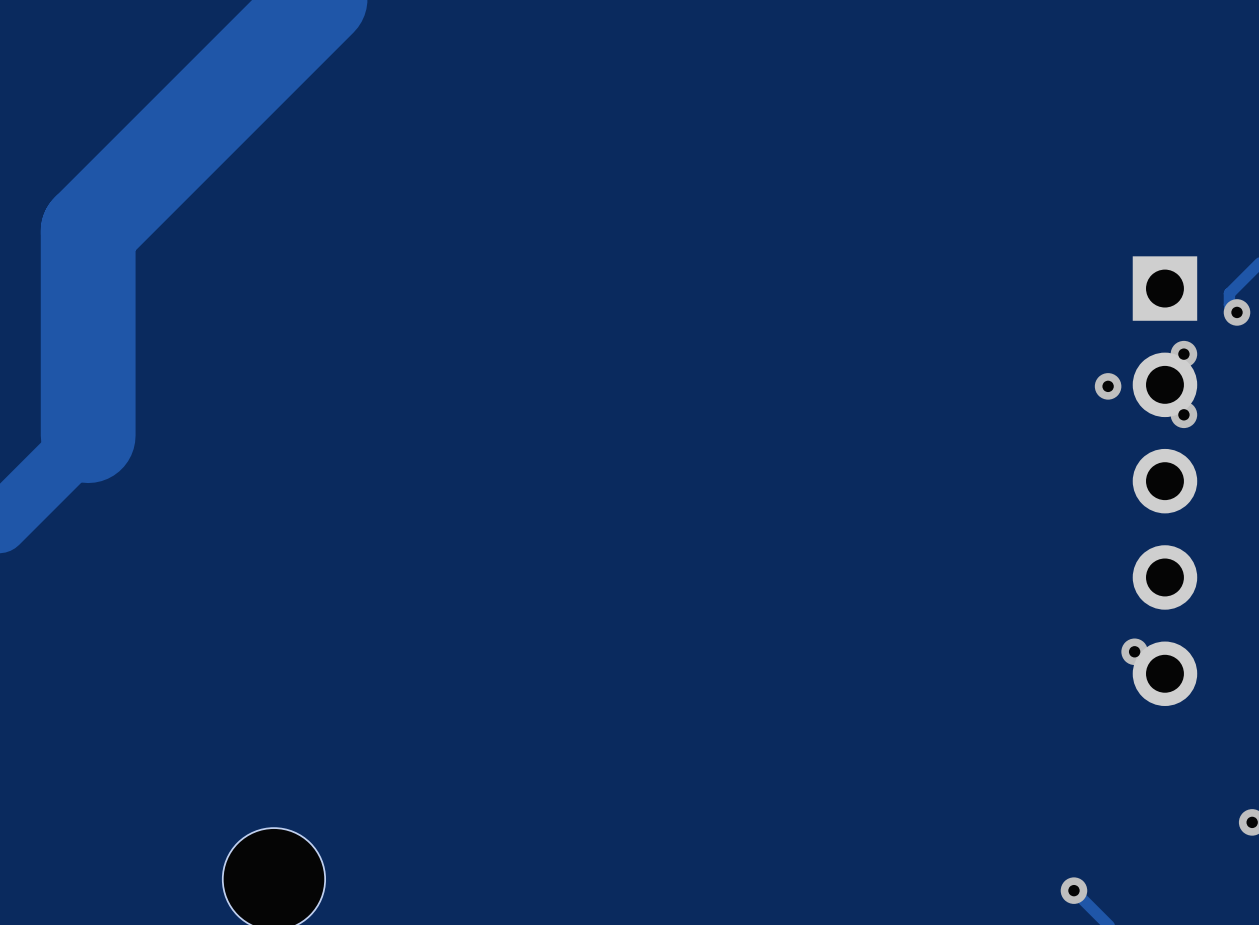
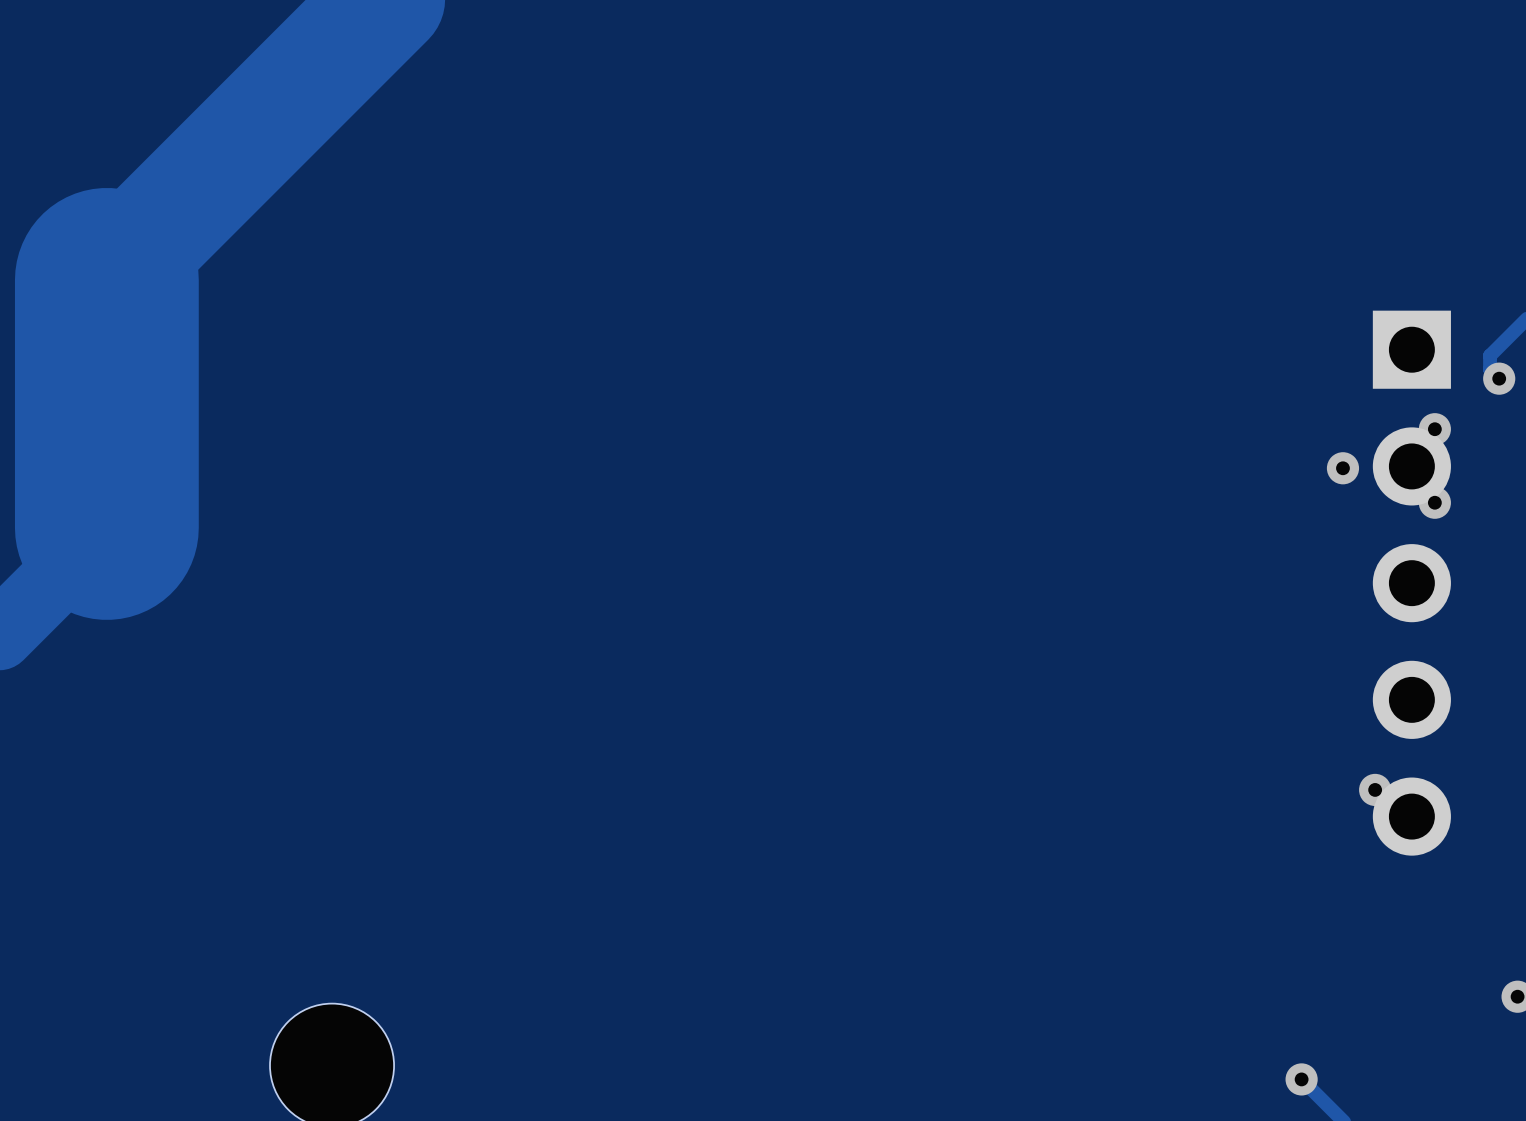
track width: thin (88, 230) (88, 435) -> thick (106, 279) (106, 528)

